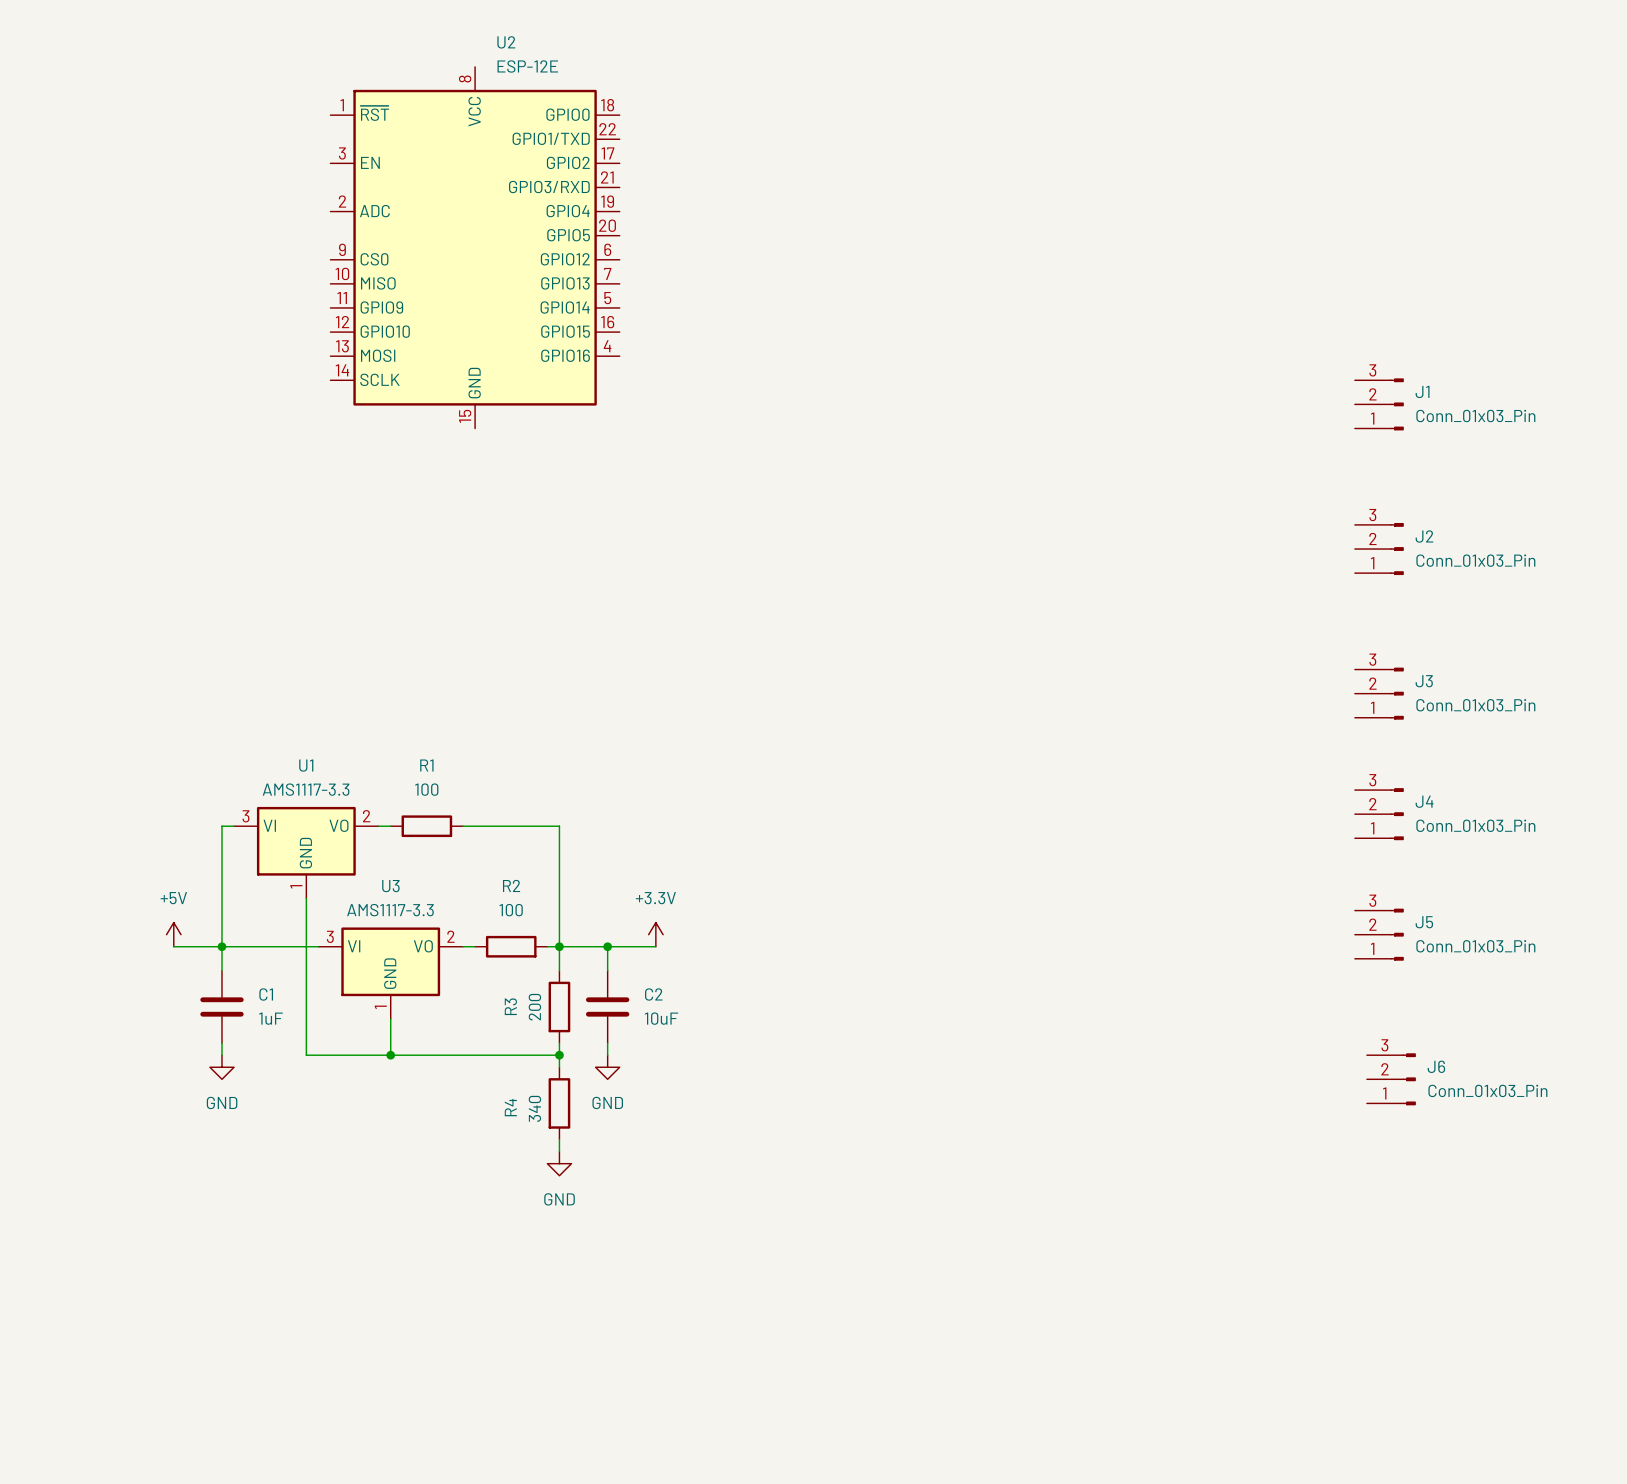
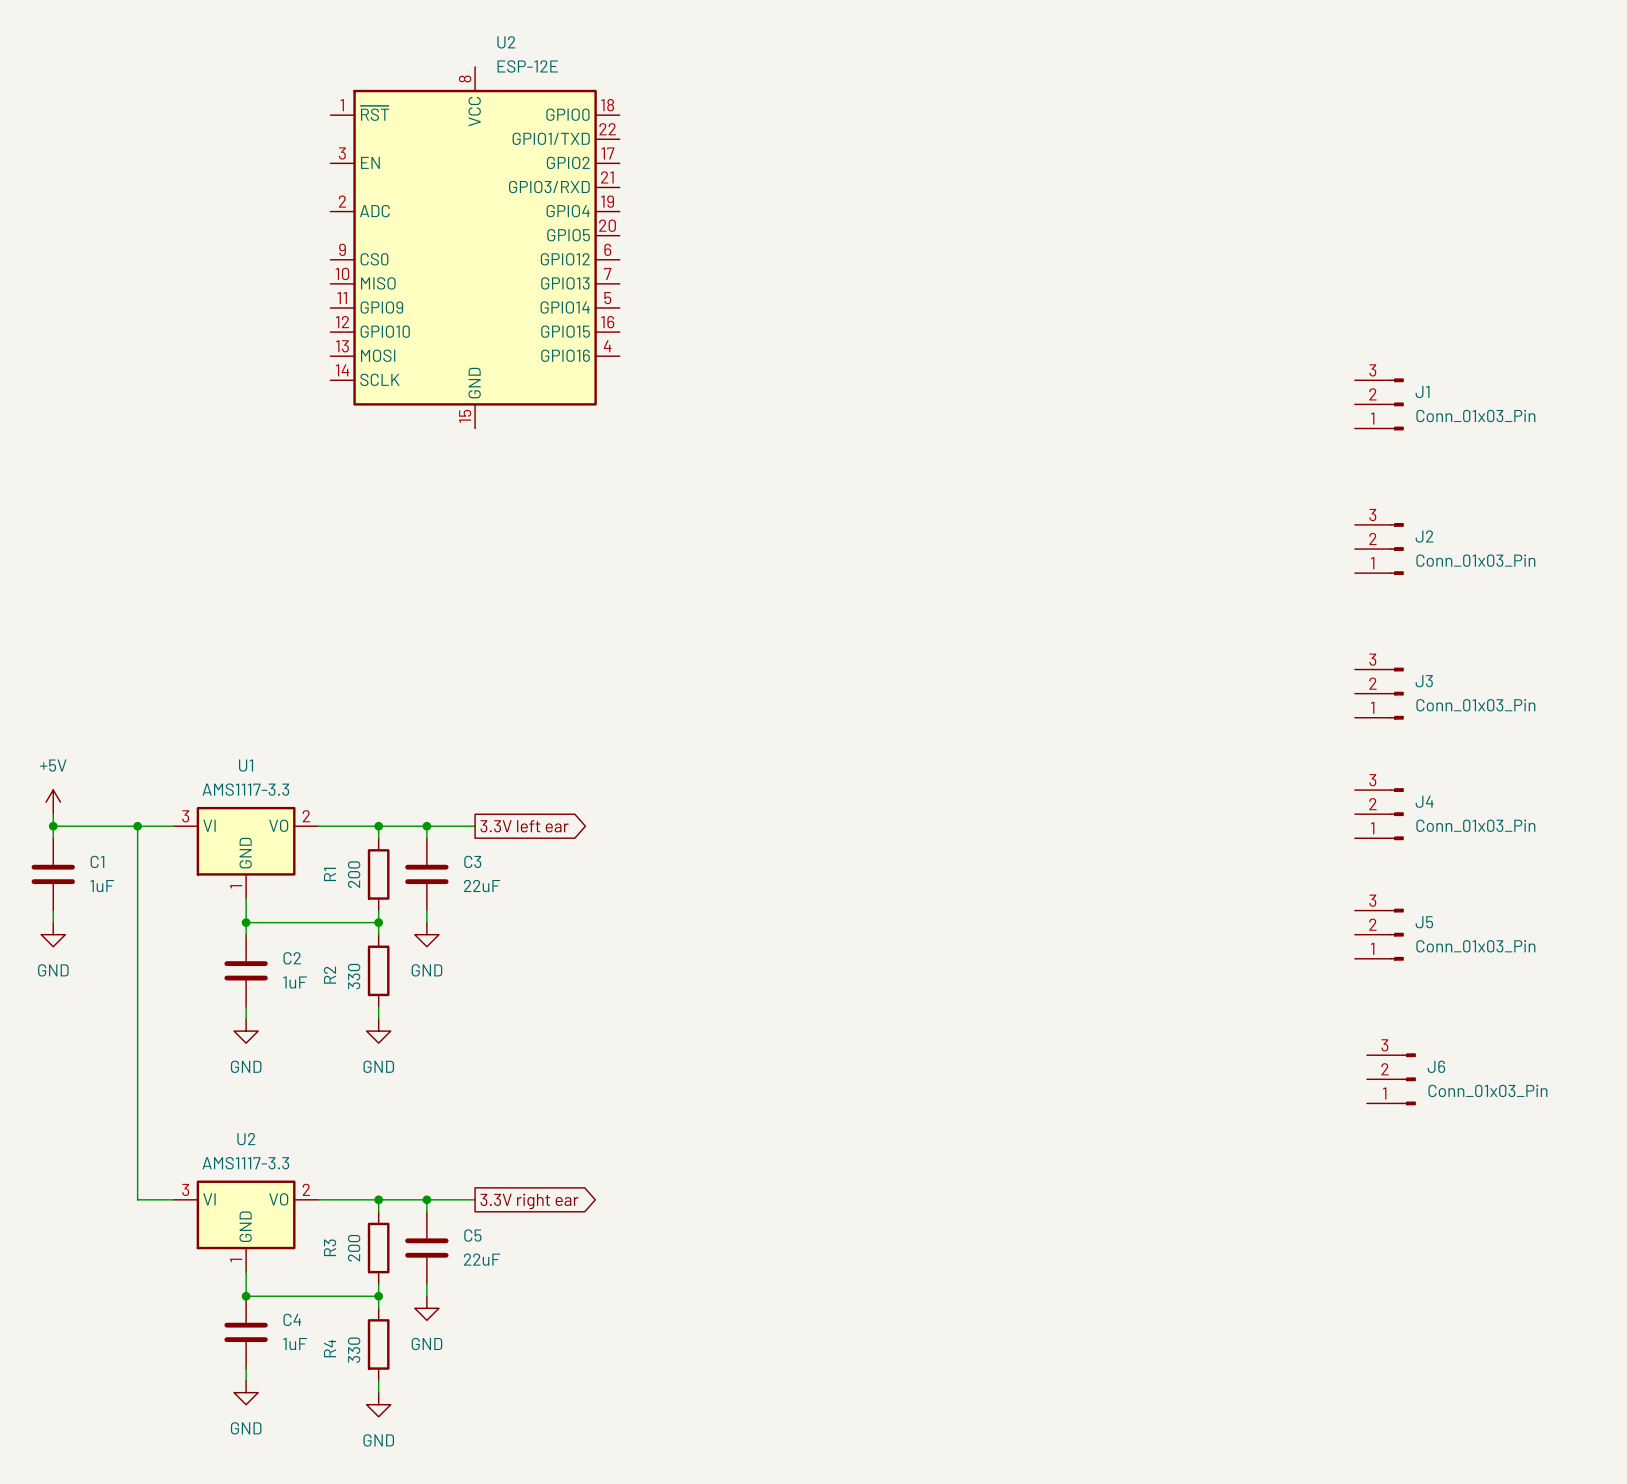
R1 name position: R1 (426, 765) -> R1 (330, 874)
R1 value: 100 (426, 789) -> 200 (354, 874)
wire: none -> (53, 814) (53, 838)
wire: none -> (53, 826) (173, 826)
junction: none -> (53, 826)
wire: none -> (137, 826) (137, 1199) (173, 1199)
junction: none -> (137, 826)
wire: (234, 826) (221, 826) (221, 970) -> none
junction: none -> (378, 826)
wire: none -> (390, 826) (463, 826)
wire: none -> (426, 826) (426, 838)
junction: none -> (426, 826)
R1 rotation: 0° (426, 826) -> 90° clockwise (378, 874)
R1 position: (426, 826) -> (378, 874)
wire: (475, 826) (559, 826) (559, 970) -> none
global label: none -> 3.3V left ear (524, 826)
U1 position: (306, 852) -> (246, 852)
C3: none -> 22uF (426, 874)
R2 name position: R2 (511, 885) -> R2 (329, 975)
wire: (306, 898) (306, 1055) (559, 1055) -> none
wire: none -> (53, 910) (53, 922)
R2 value: 100 (511, 910) -> 330 (354, 976)
wire: none -> (246, 922) (378, 922)
junction: none -> (378, 922)
power symbol: none -> GND (53, 934)
power symbol position: +5V (173, 934) -> +5V (53, 802)
power symbol: none -> GND (426, 934)
power symbol: +3.3V (655, 934) -> none
wire: (173, 946) (318, 946) -> none
junction position: (221, 946) -> (246, 922)
wire: (463, 946) (475, 946) -> none
R2 rotation: 0° (511, 946) -> 90° clockwise (378, 970)
R2 position: (511, 946) -> (378, 970)
wire: (547, 946) (655, 946) -> none
junction: (559, 946) -> none
wire: (607, 946) (607, 970) -> none
junction: (607, 946) -> none
U3: AMS1117-3.3 (390, 973) -> none
C1 position: (221, 1007) -> (53, 874)
R3 position: (559, 1007) -> (378, 1248)
C2 position: (607, 1007) -> (246, 970)
C2 value: 10uF (661, 1018) -> 1uF (295, 982)
wire: (390, 1019) (390, 1055) -> (246, 898) (246, 934)
power symbol: none -> GND (378, 1031)
wire: (221, 1043) (221, 1055) -> (246, 1007) (246, 1019)
wire: (559, 1043) (559, 1067) -> (378, 910) (378, 934)
wire: (607, 1043) (607, 1055) -> (426, 910) (426, 922)
junction: (390, 1055) -> none
junction: (559, 1055) -> none
power symbol position: GND (221, 1067) -> GND (246, 1031)
power symbol: GND (607, 1067) -> none
R4 position: (559, 1103) -> (378, 1344)
R4 value: 340 (534, 1108) -> 330 (354, 1350)
wire: (559, 1139) (559, 1151) -> (378, 1007) (378, 1019)
power symbol: GND (559, 1163) -> none
wire: none -> (318, 1199) (475, 1199)
wire: none -> (378, 1199) (378, 1211)
junction: none -> (378, 1199)
wire: none -> (426, 1199) (426, 1211)
junction: none -> (426, 1199)
global label: none -> 3.3V right ear (529, 1201)
U2: none -> AMS1117-3.3 (246, 1226)
C5: none -> 22uF (426, 1248)
wire: none -> (246, 1272) (246, 1296) (378, 1296)
wire: none -> (378, 1284) (378, 1308)
wire: none -> (426, 1284) (426, 1296)
junction: none -> (246, 1296)
junction: none -> (378, 1296)
power symbol: none -> GND (426, 1308)
C4: none -> 1uF (246, 1332)
wire: none -> (246, 1368) (246, 1380)
wire: none -> (378, 1380) (378, 1392)
power symbol: none -> GND (246, 1392)
power symbol: none -> GND (378, 1404)

